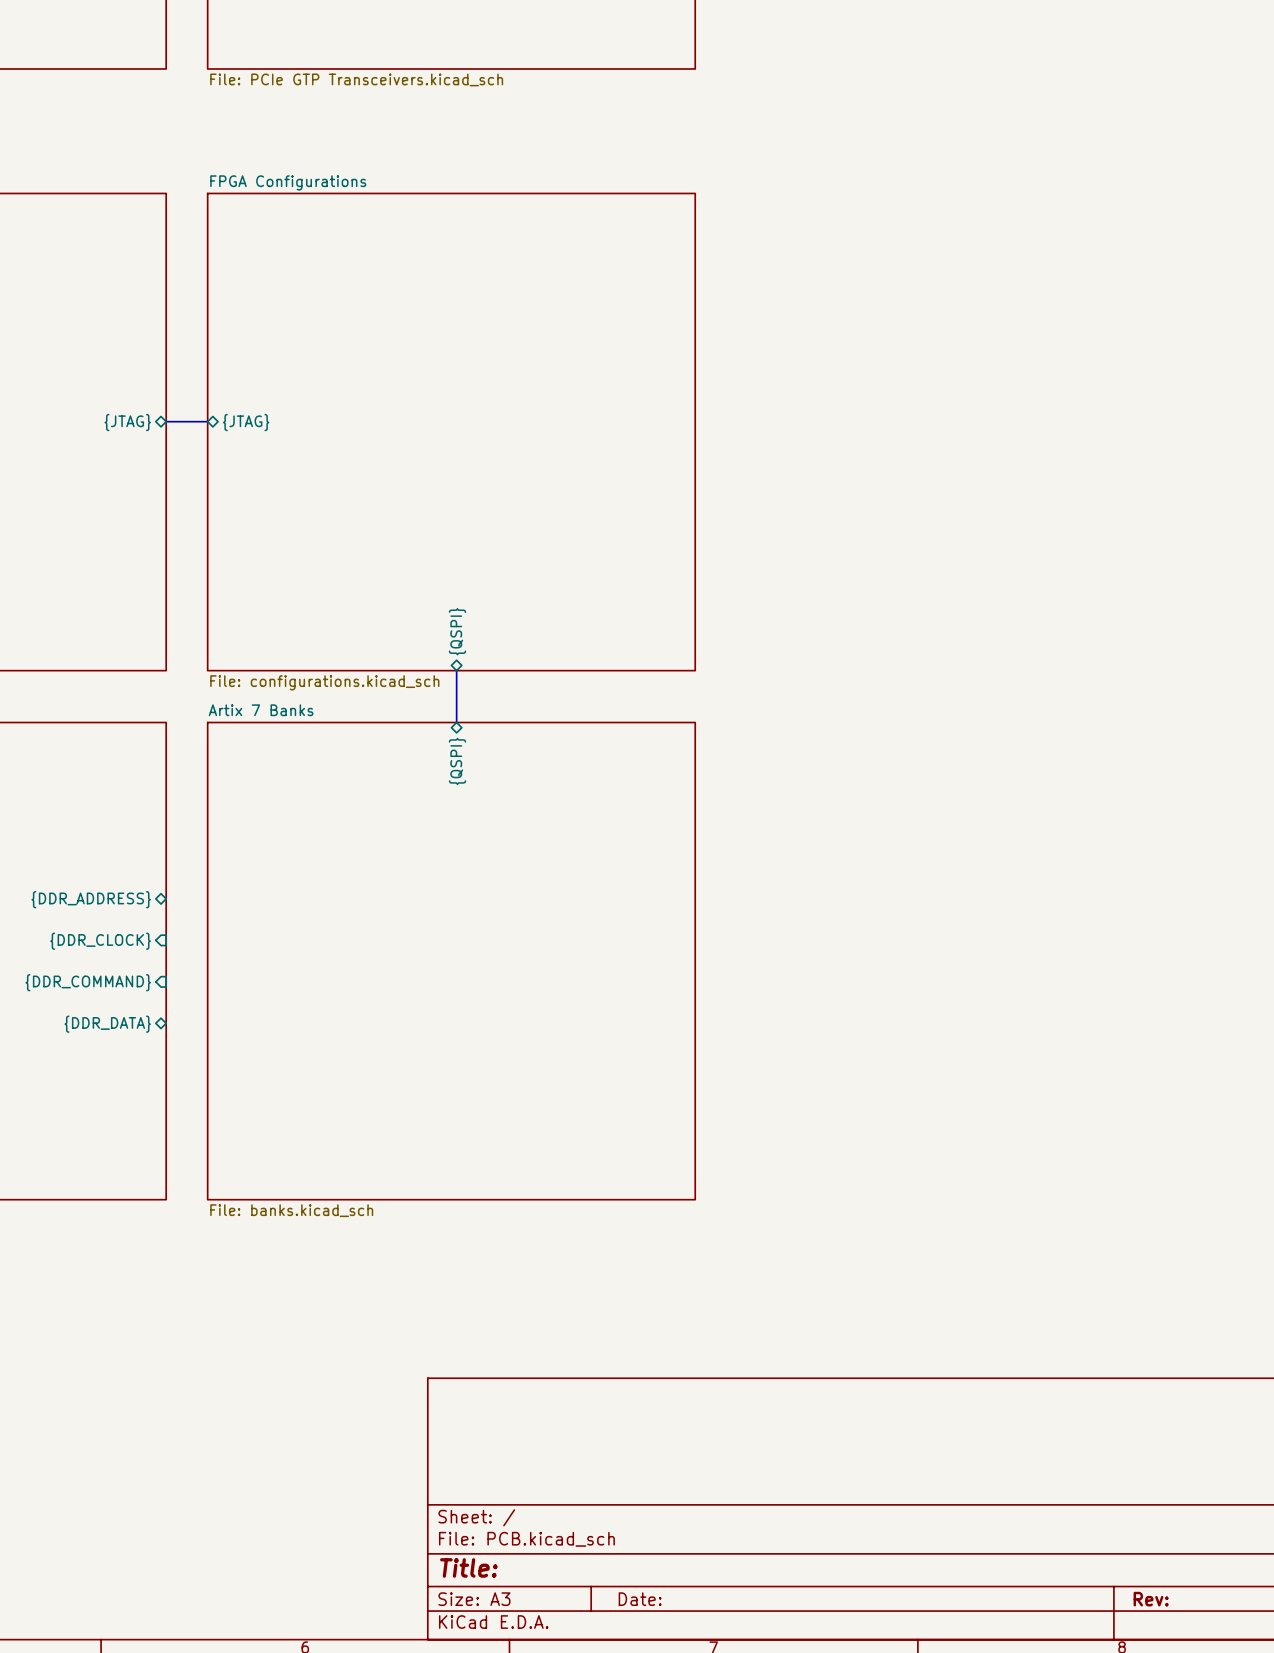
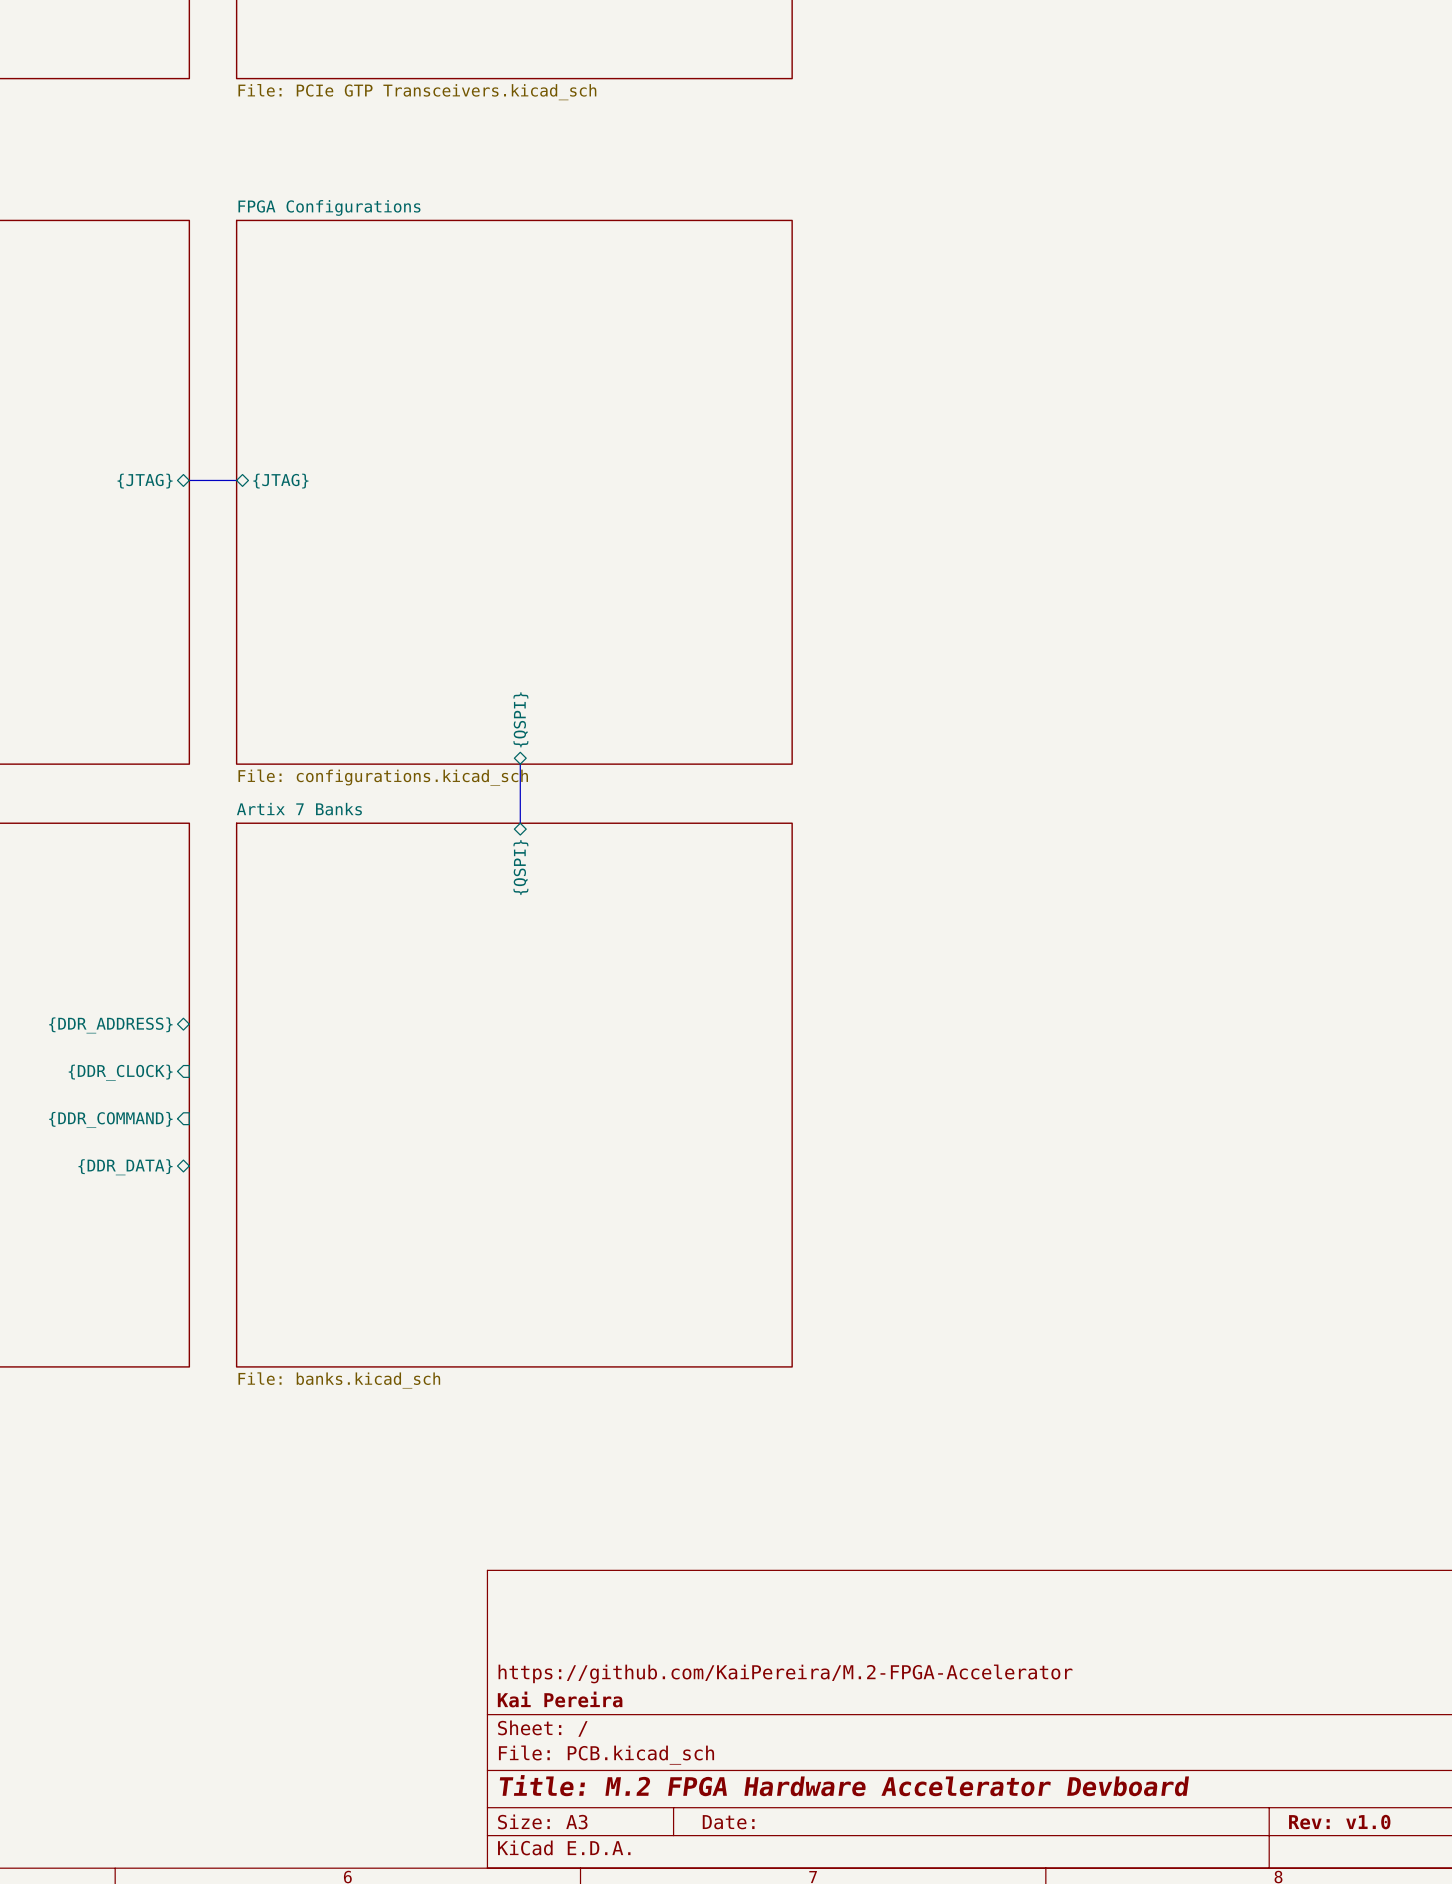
title block: none -> https://github.com/KaiPereira/M.2-FPGA-Accelerator (785, 1673)
title block: none -> Kai Pereira (560, 1699)
title block: Title: (468, 1567) -> Title: M.2 FPGA Hardware Accelerator Devboard (844, 1785)
title block: Rev: (1151, 1599) -> Rev: v1.0 (1339, 1822)

